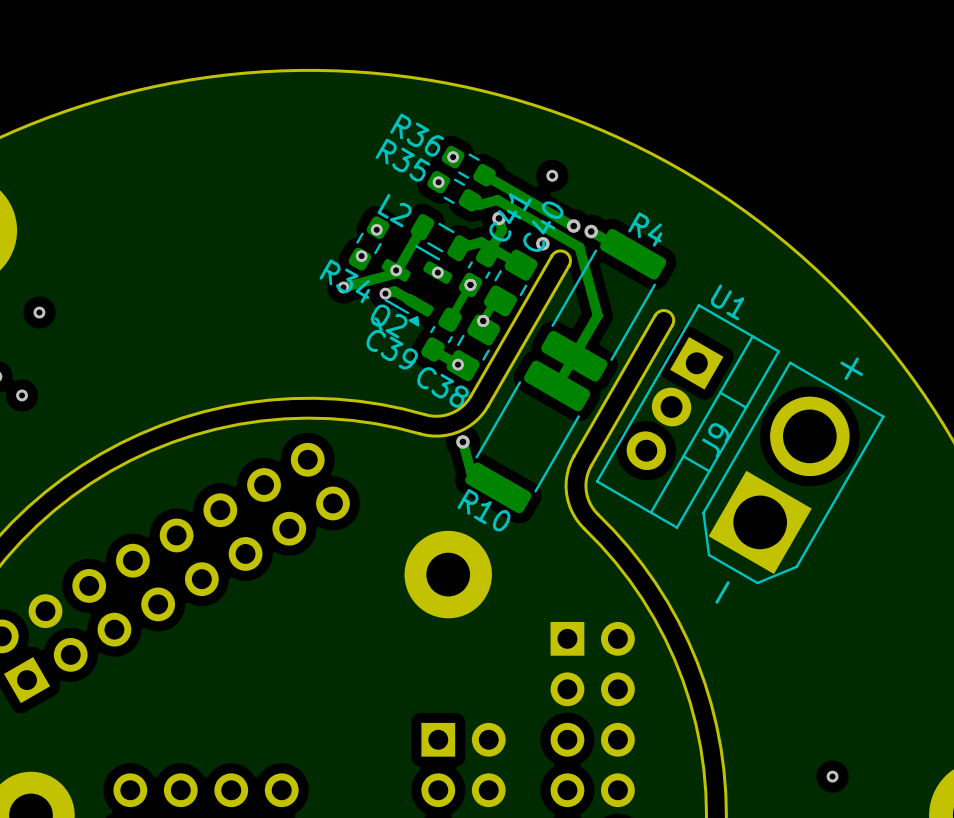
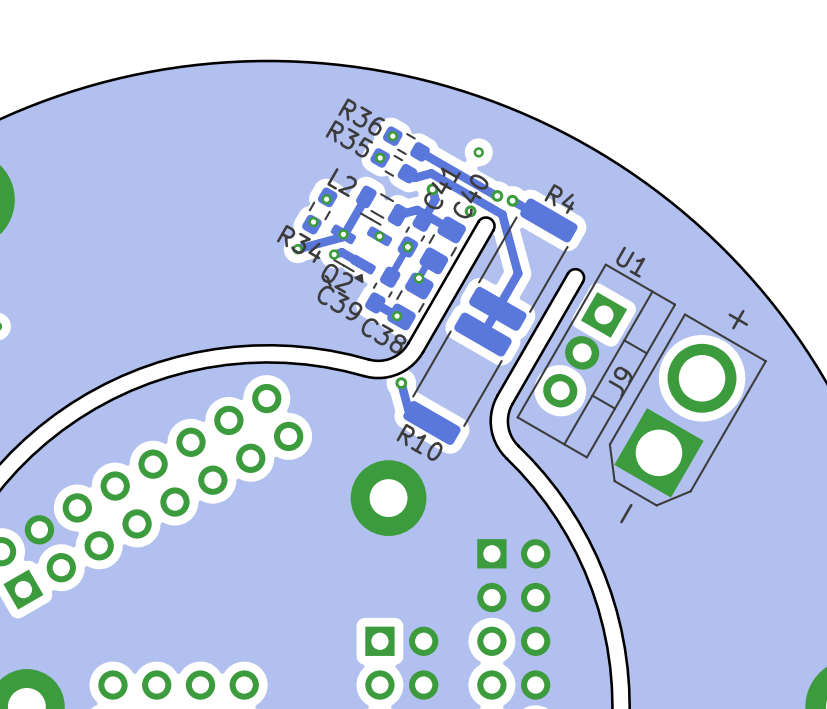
via: (39, 312) -> none
via: (22, 395) -> none
via: (832, 776) -> none

